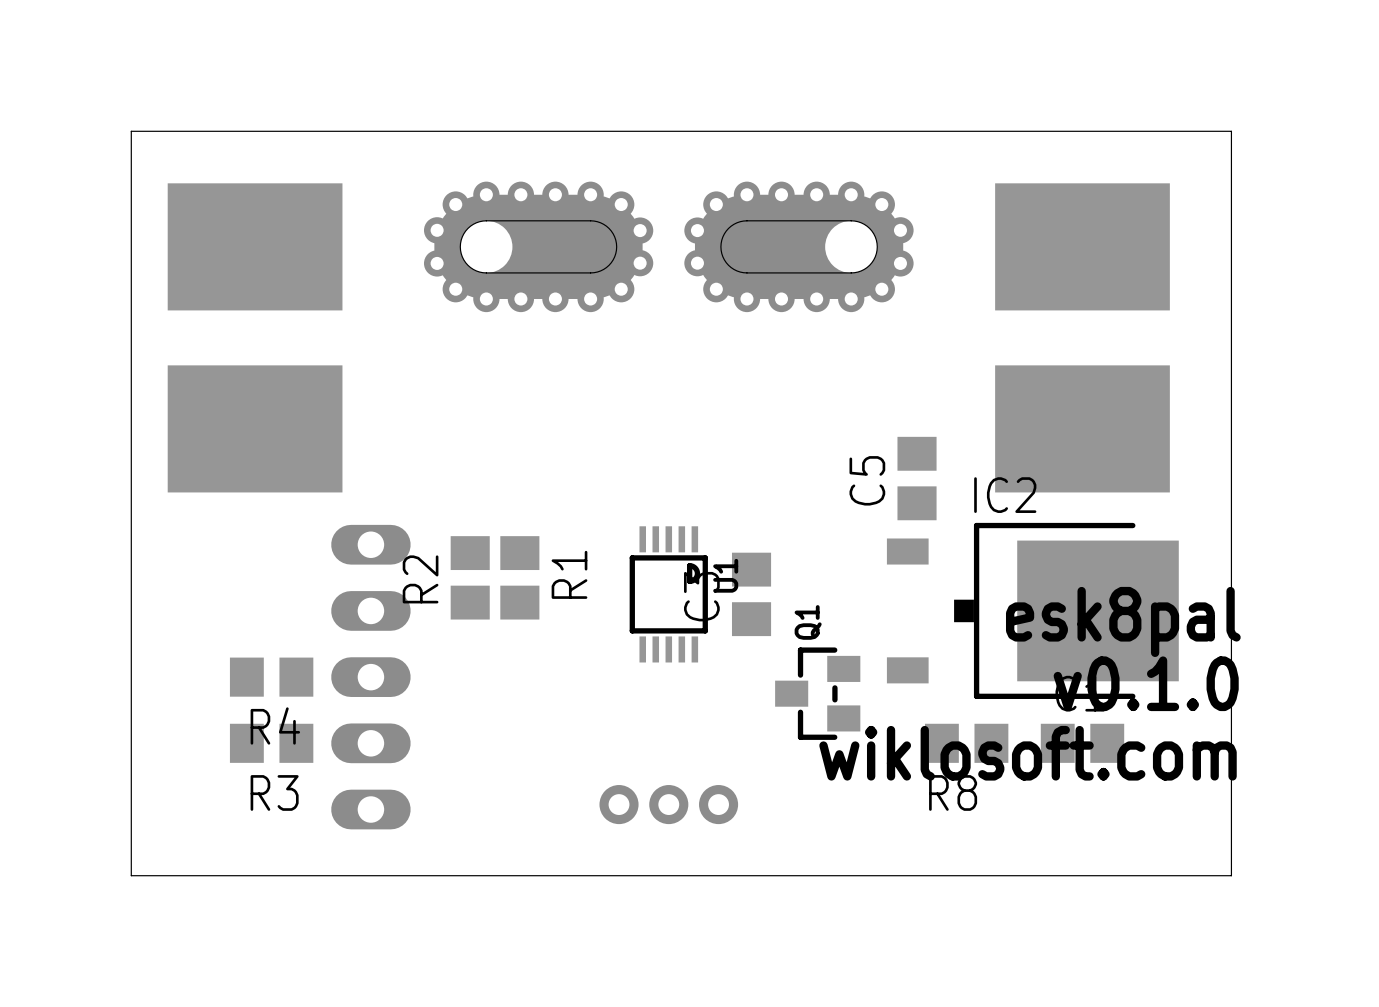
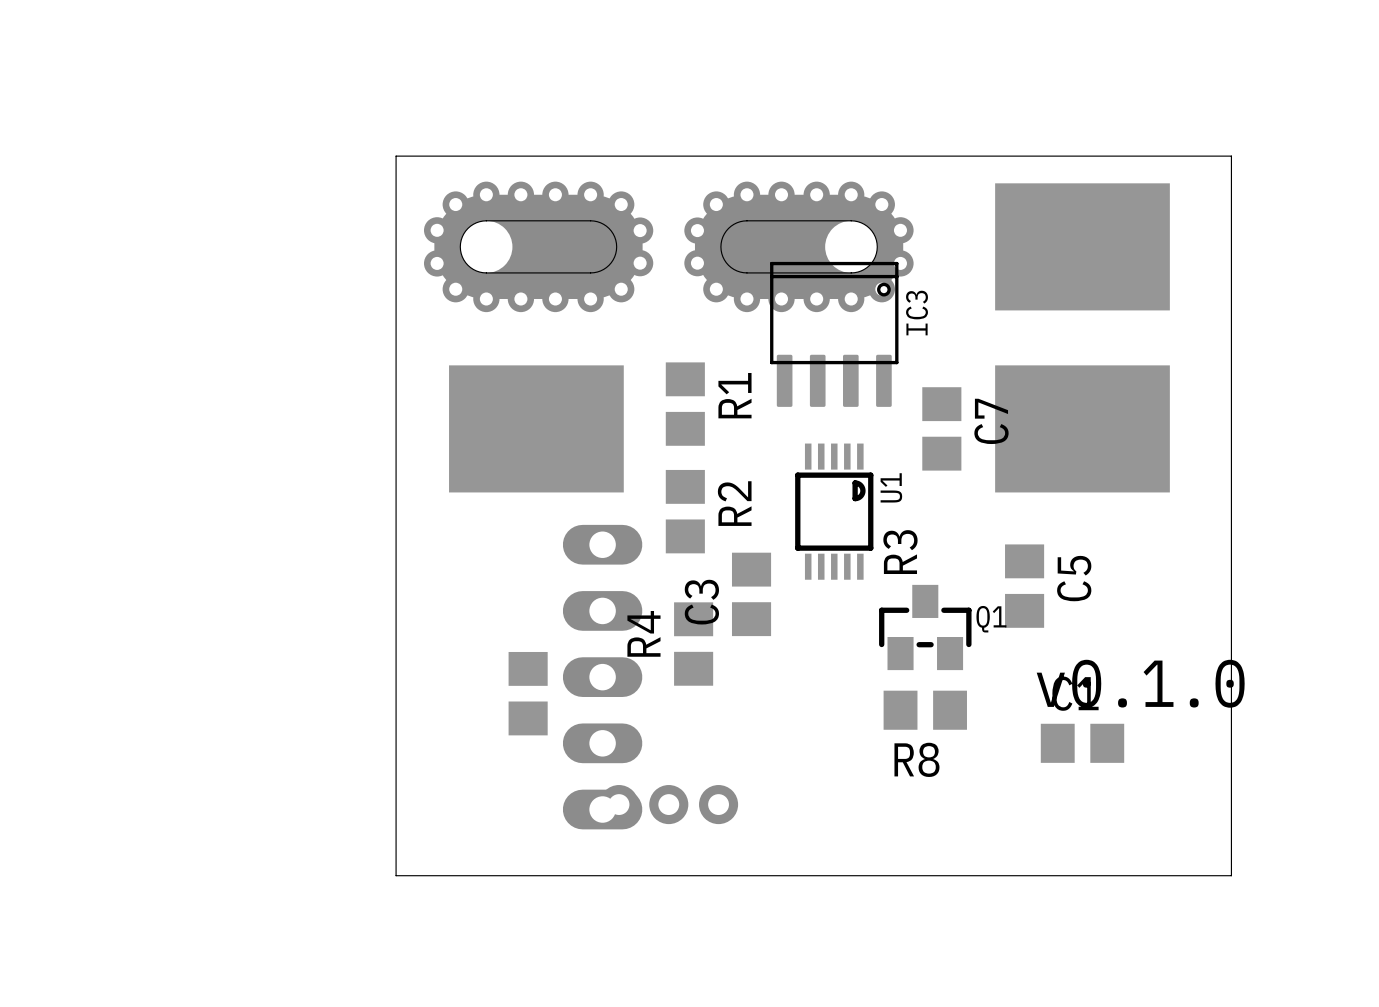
board edge: (1231, 156) (1231, 131) (131, 131) (131, 875) (396, 875) -> (1231, 156) (396, 156) (396, 875)
part: (255, 246) -> none
IC3: none -> (834, 313)
part: (255, 428) -> none
part: none -> (536, 428)
C7: none -> (941, 428)
C5 position: (917, 478) -> (1024, 586)
C5 name position: C5 (867, 480) -> C5 (1074, 578)
R2 position: (470, 577) -> (685, 511)
R1 position: (519, 577) -> (685, 404)
R2 name position: R2 (420, 579) -> R2 (734, 503)
U1 position: (668, 594) -> (834, 511)
IC2: (1032, 610) -> none
text: esk8pal (1123, 621) -> none
R4 rotation: 0° (271, 677) -> 90° clockwise (693, 644)
R4 position: (271, 677) -> (693, 644)
part position: (370, 677) -> (602, 677)
Q1 rotation: 0° (817, 693) -> 90° clockwise (925, 627)
Q1 position: (817, 693) -> (925, 627)
R3 rotation: 0° (271, 743) -> 90° clockwise (528, 693)
R3 position: (271, 743) -> (528, 693)
R8 position: (966, 743) -> (925, 710)
text: wiklosoft.com (1028, 753) -> none
R3 name position: R3 (274, 792) -> R3 (900, 552)

